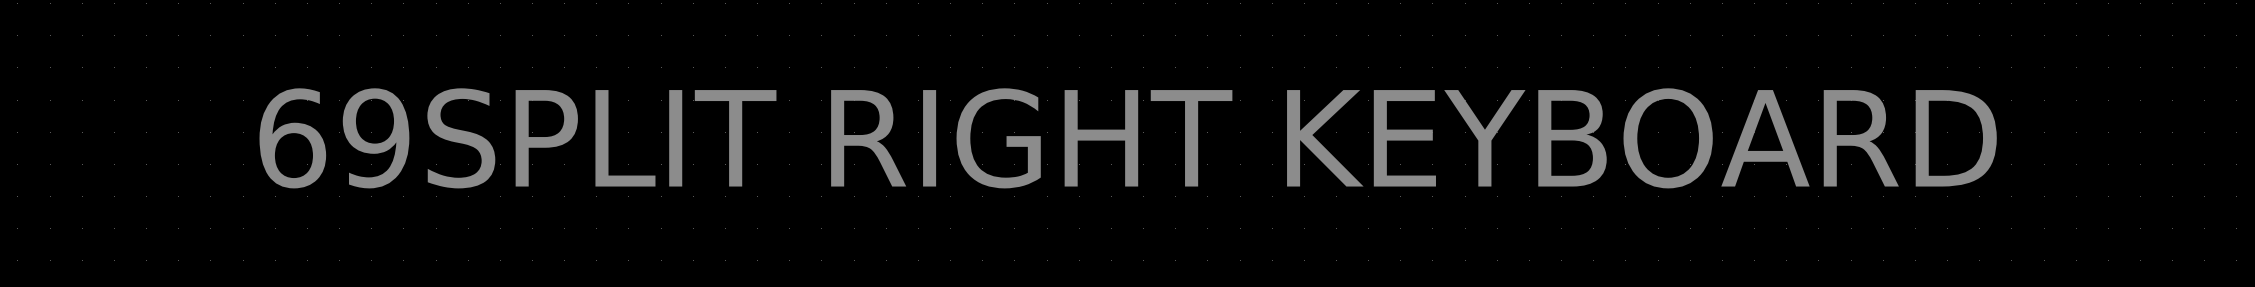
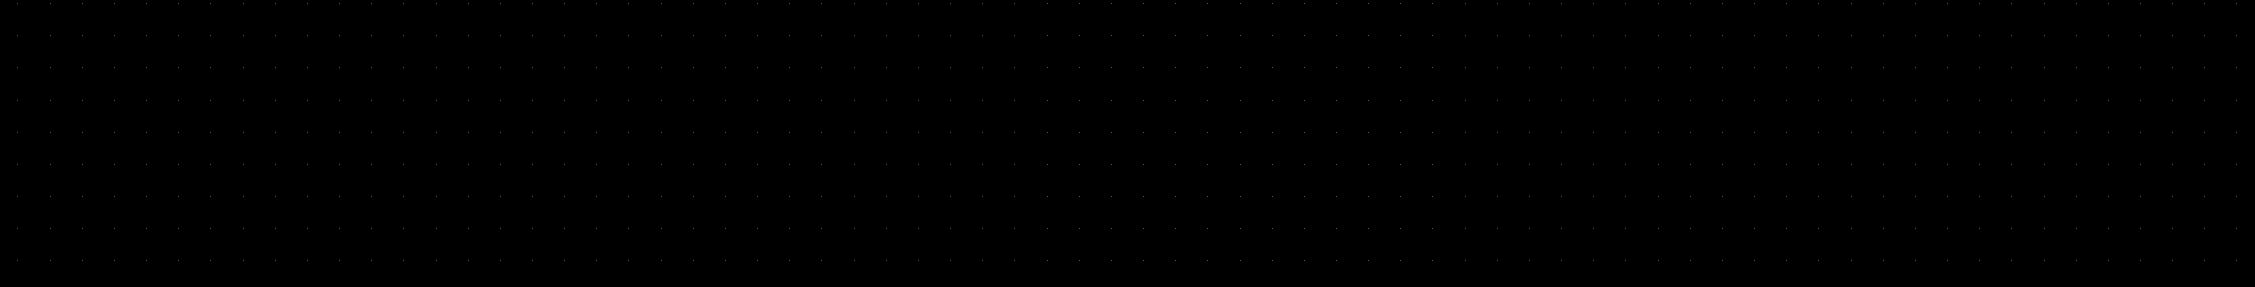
text: 69SPLIT RIGHT KEYBOARD (1128, 138) -> none

